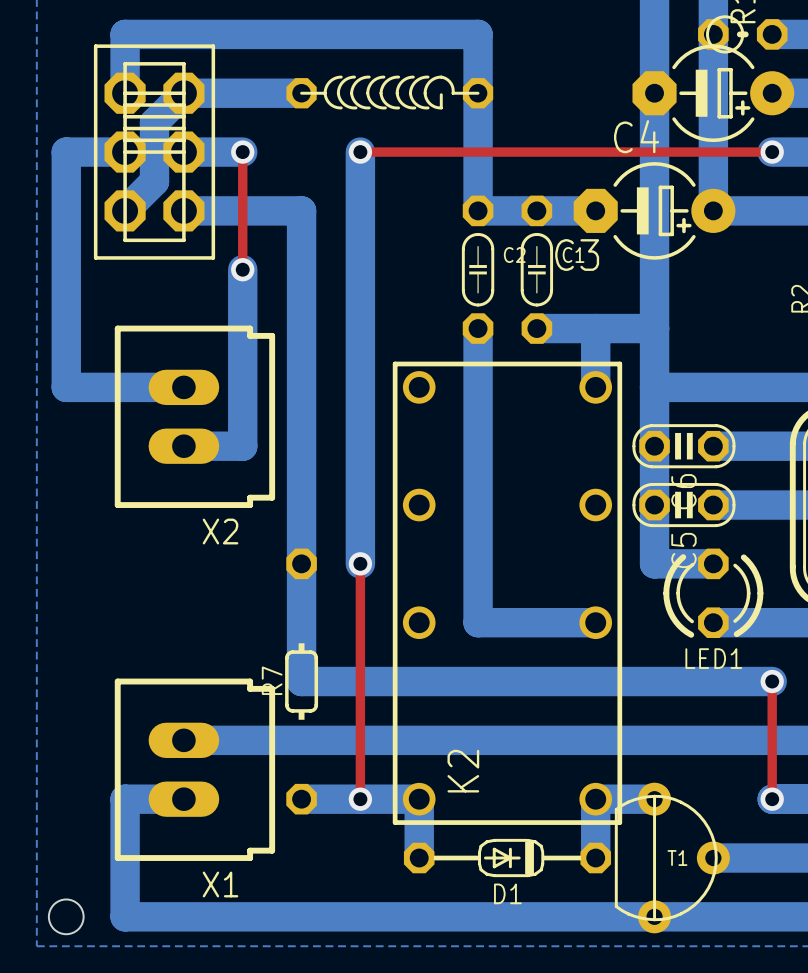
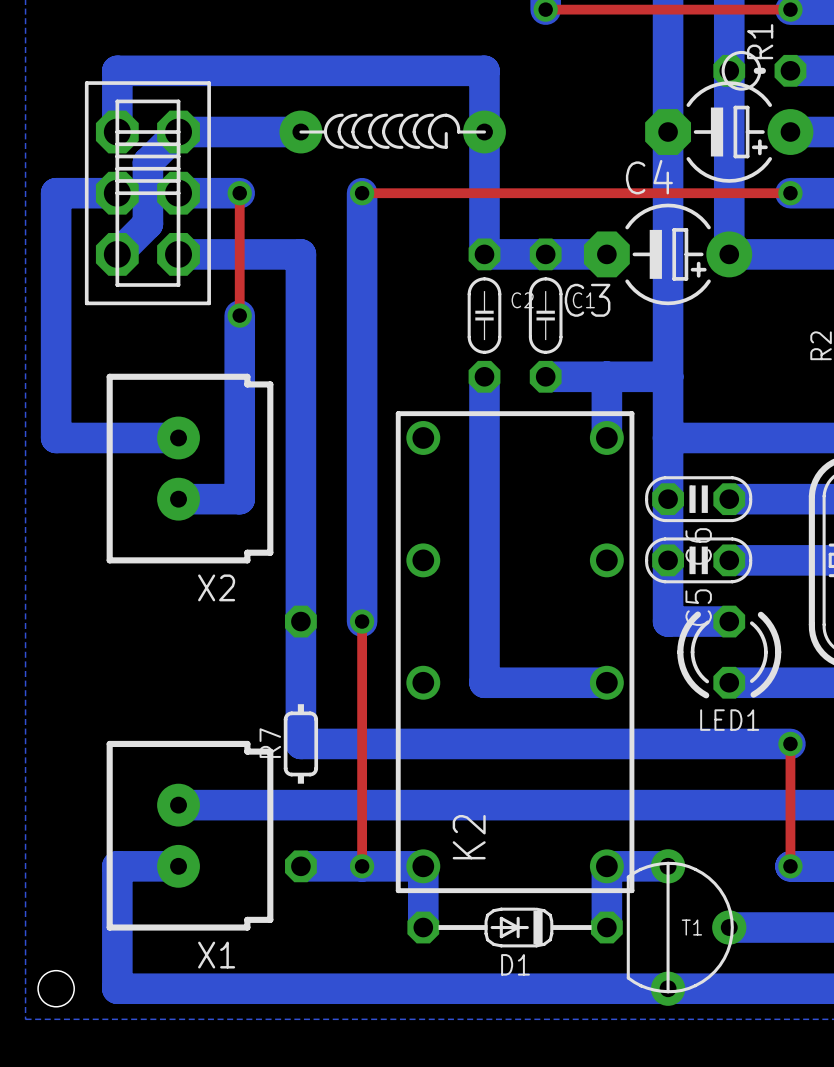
part footprint: [286, 75, 494, 110] -> [279, 110, 506, 154]
X2 footprint: [114, 325, 276, 508] -> [106, 373, 274, 564]
X1 footprint: [114, 678, 276, 861] -> [106, 740, 274, 931]

